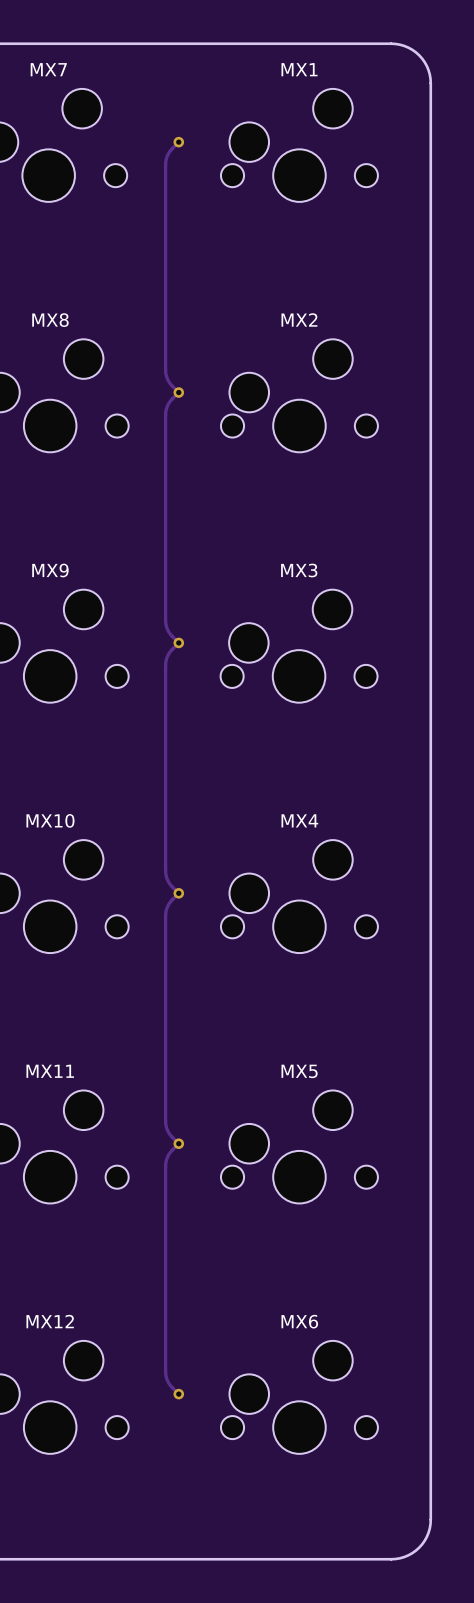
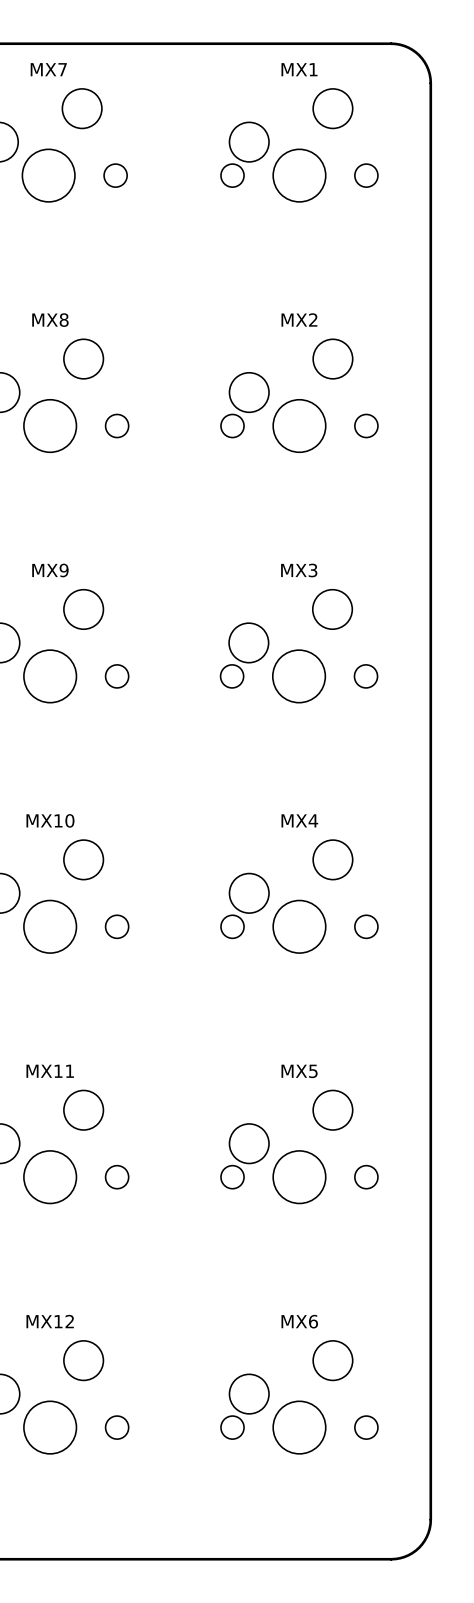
track: (178, 142) (168, 154) (165, 164) (165, 372) (169, 382) (178, 392) (168, 404) (165, 415) (165, 622) (169, 632) (178, 642) (168, 654) (165, 665) (165, 873) (169, 883) (178, 893) (168, 905) (165, 915) (165, 1123) (169, 1133) (178, 1143) (169, 1153) (165, 1164) (165, 1371) (168, 1382) (178, 1394) -> none
via: (178, 142) -> none
via: (178, 392) -> none
via: (178, 642) -> none
via: (178, 893) -> none
via: (178, 1143) -> none
via: (178, 1394) -> none

